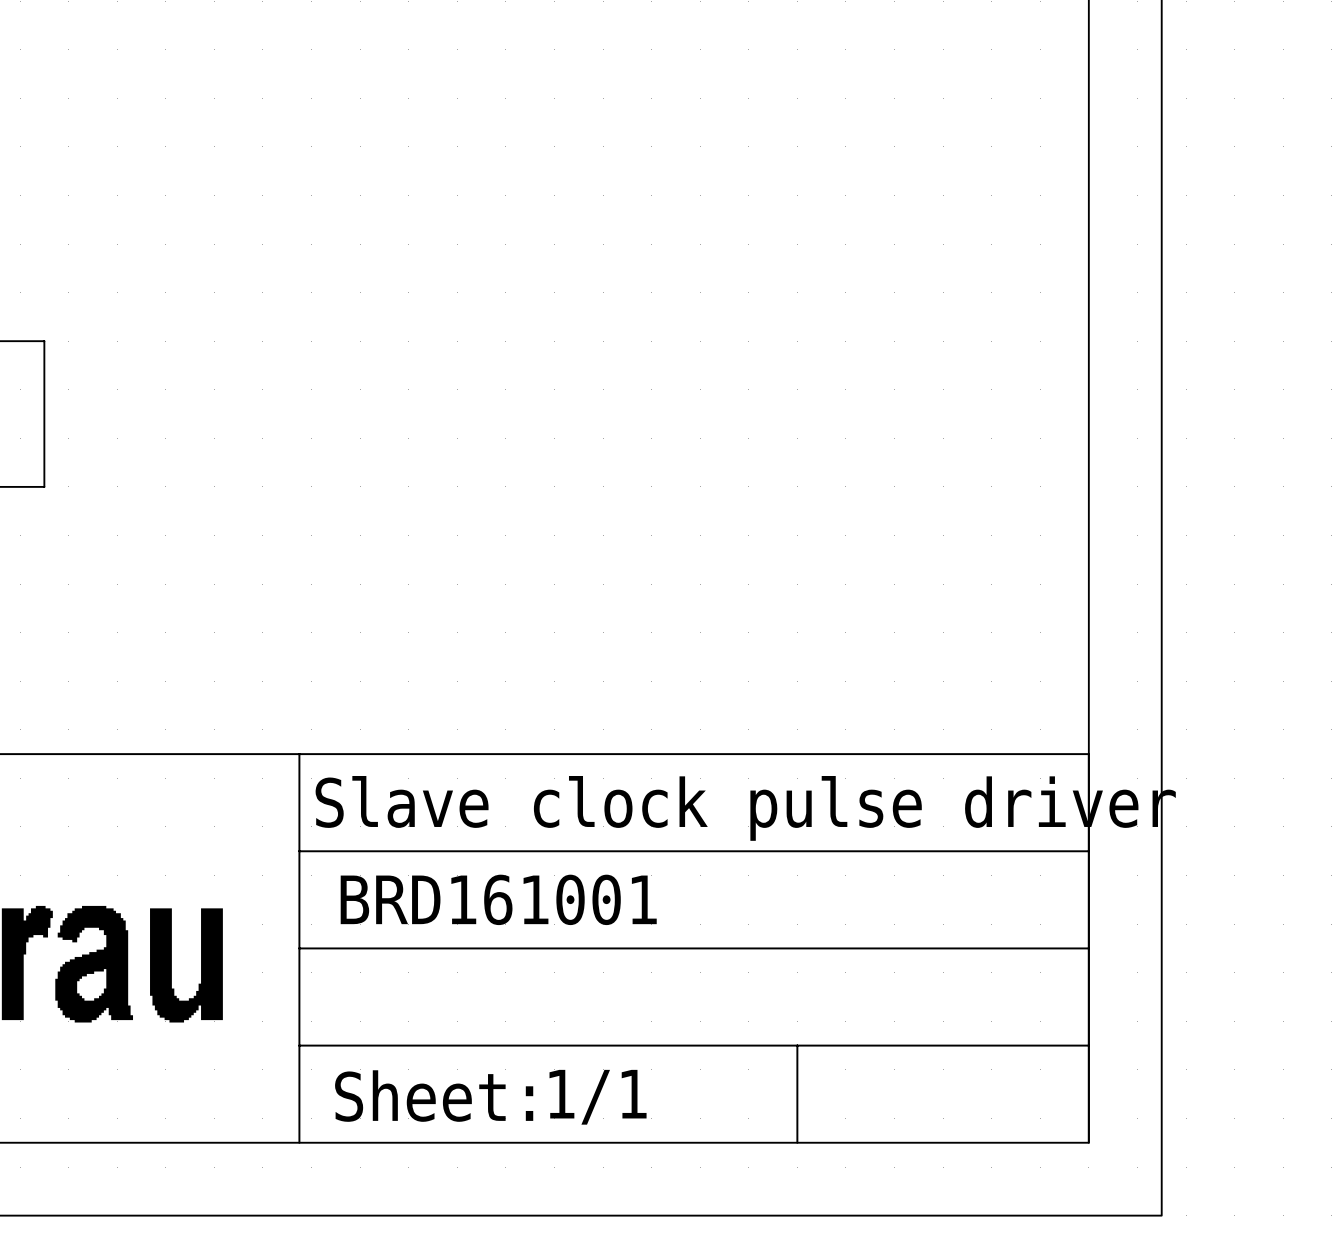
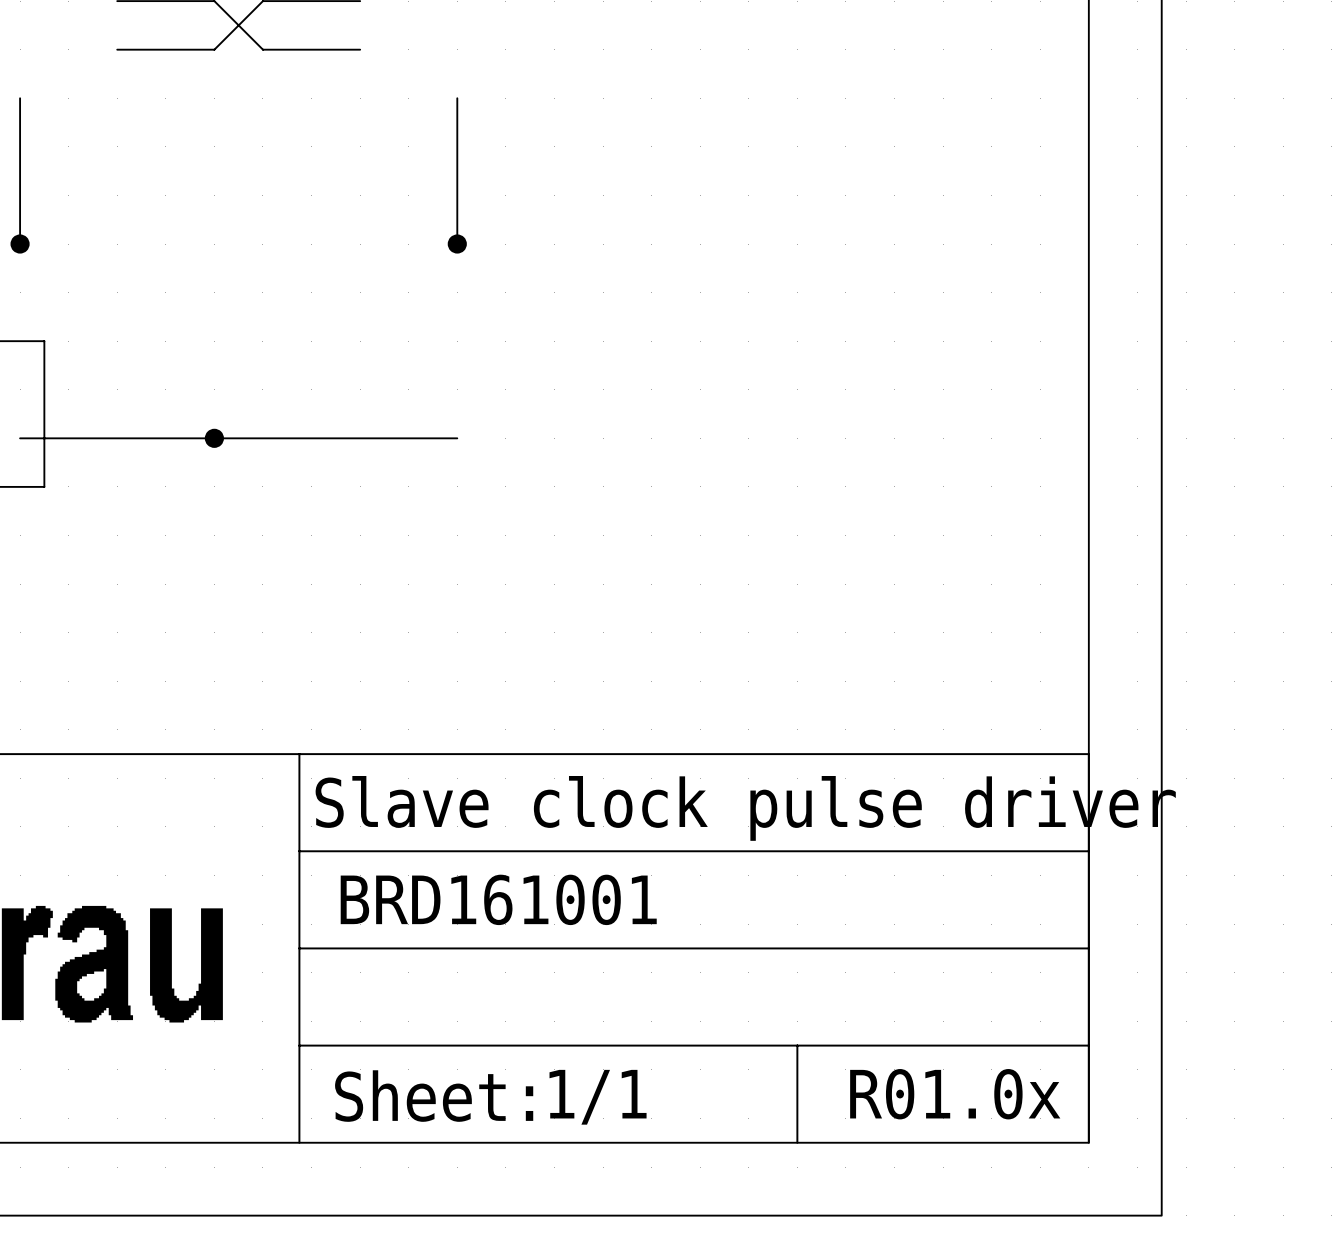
wire: none -> (117, 1) (214, 1) (262, 49) (360, 49)
wire: none -> (360, 1) (262, 1) (214, 49) (117, 49)
wire: none -> (20, 98) (20, 244)
wire: none -> (457, 98) (457, 244)
junction: none -> (20, 244)
junction: none -> (457, 244)
wire: none -> (20, 438) (457, 438)
junction: none -> (214, 438)
part text: none -> R01.0x (955, 1094)

